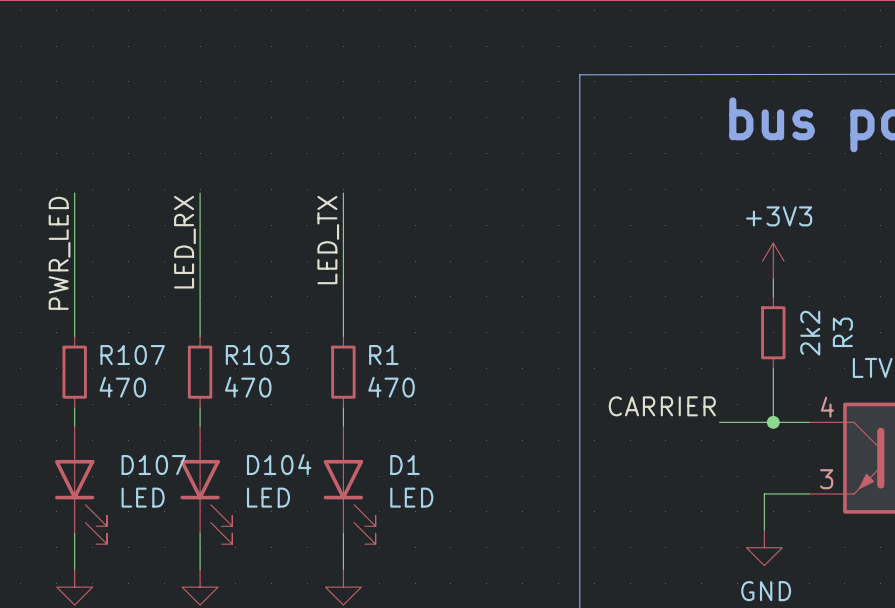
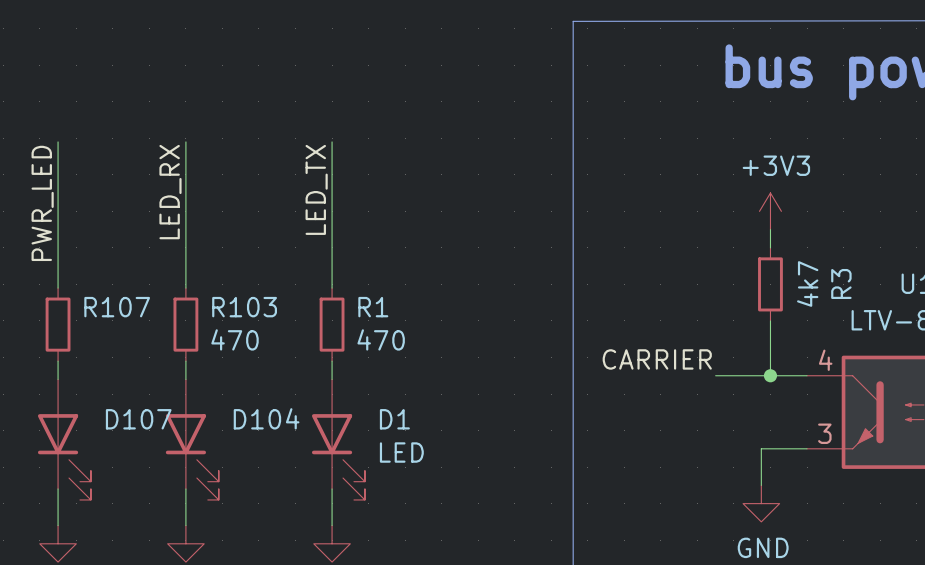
R3 value: 2k2 (810, 333) -> 4k7 (807, 283)
R107 value: 470 (122, 387) -> none
D107 value: LED (143, 497) -> none
D104 value: LED (268, 497) -> none

